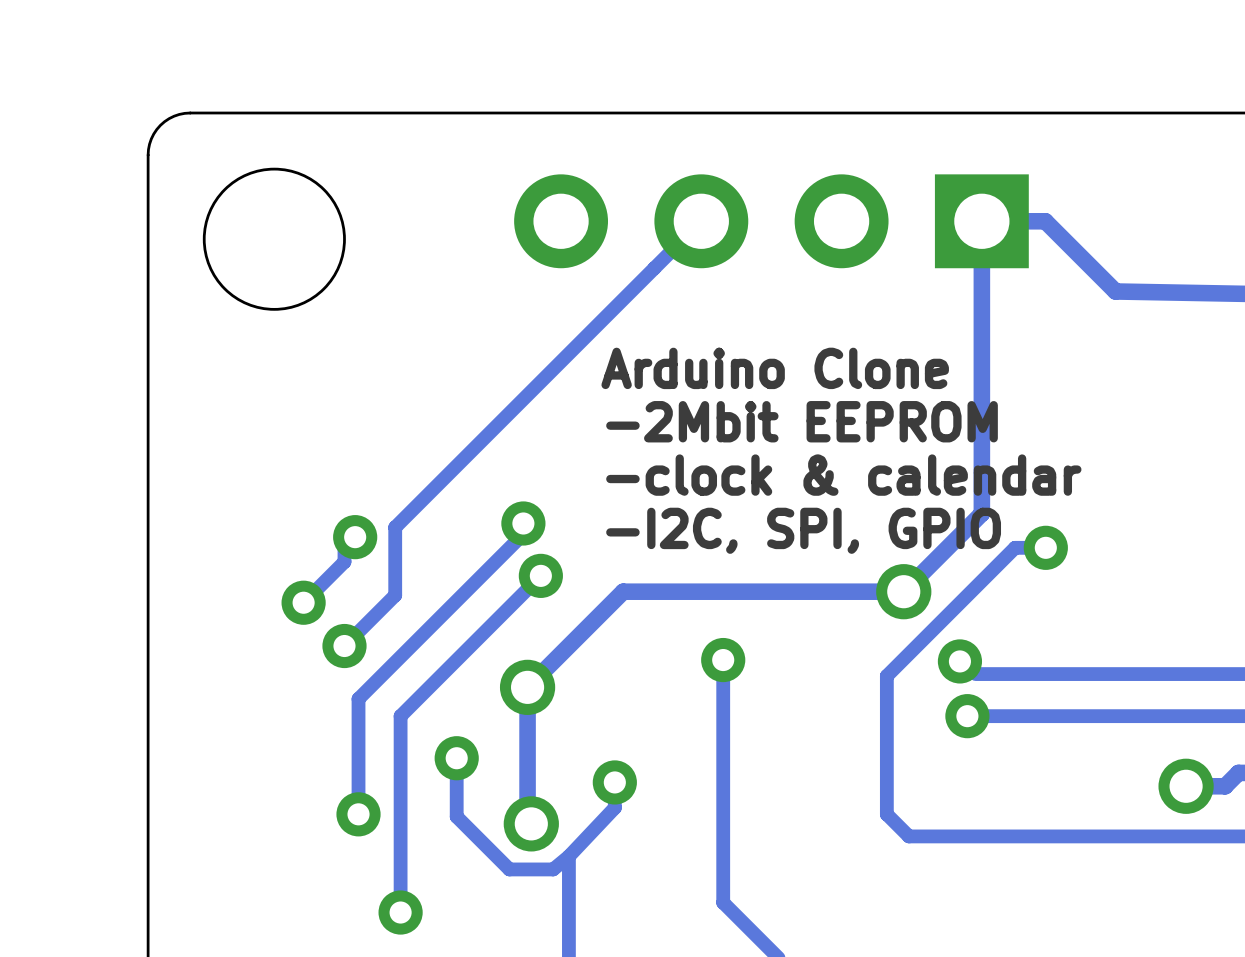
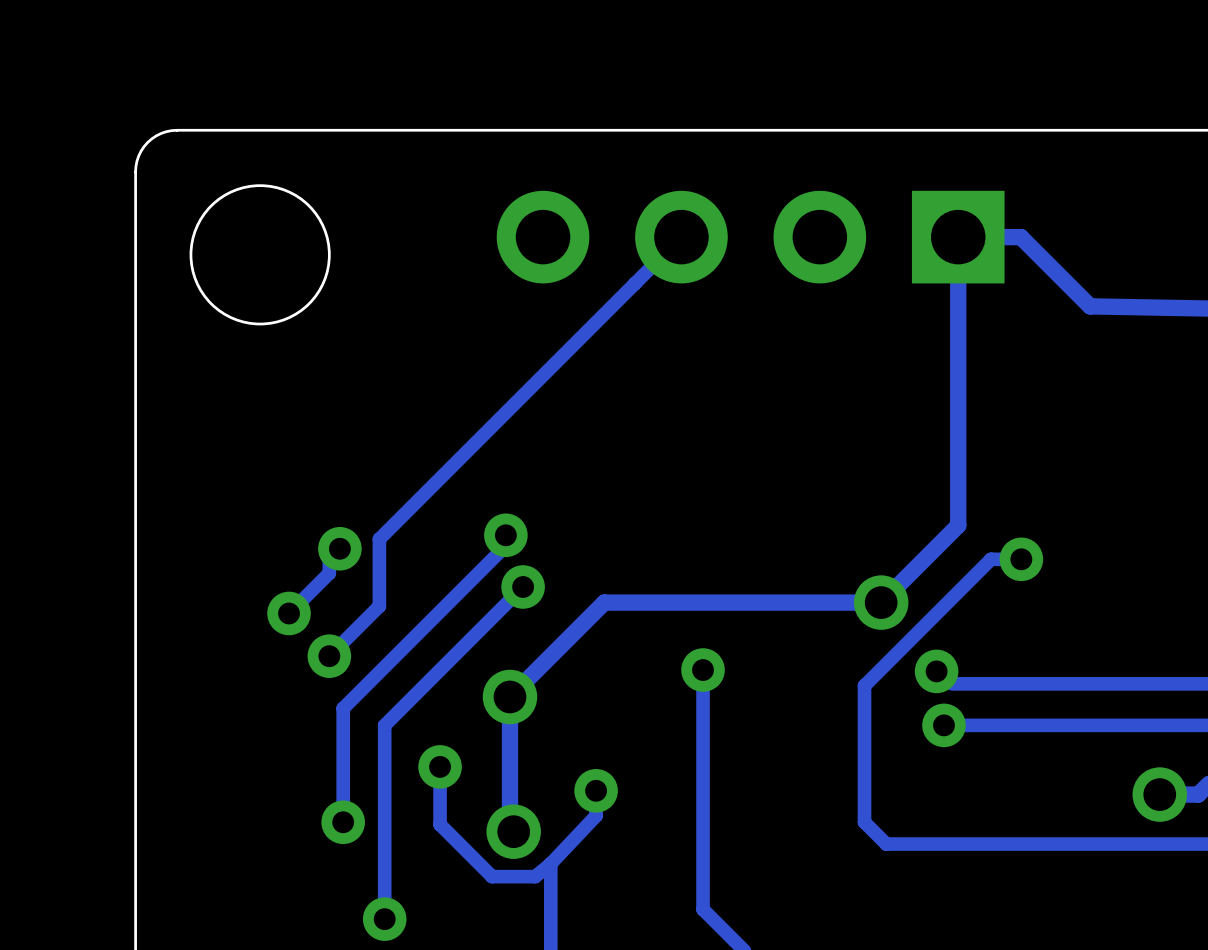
text: Arduino Clone (775, 368) -> none
text: -2Mbit EEPROM (802, 421) -> none
text: -clock & calendar (843, 475) -> none
text: -I2C, SPI, GPIO (803, 530) -> none

